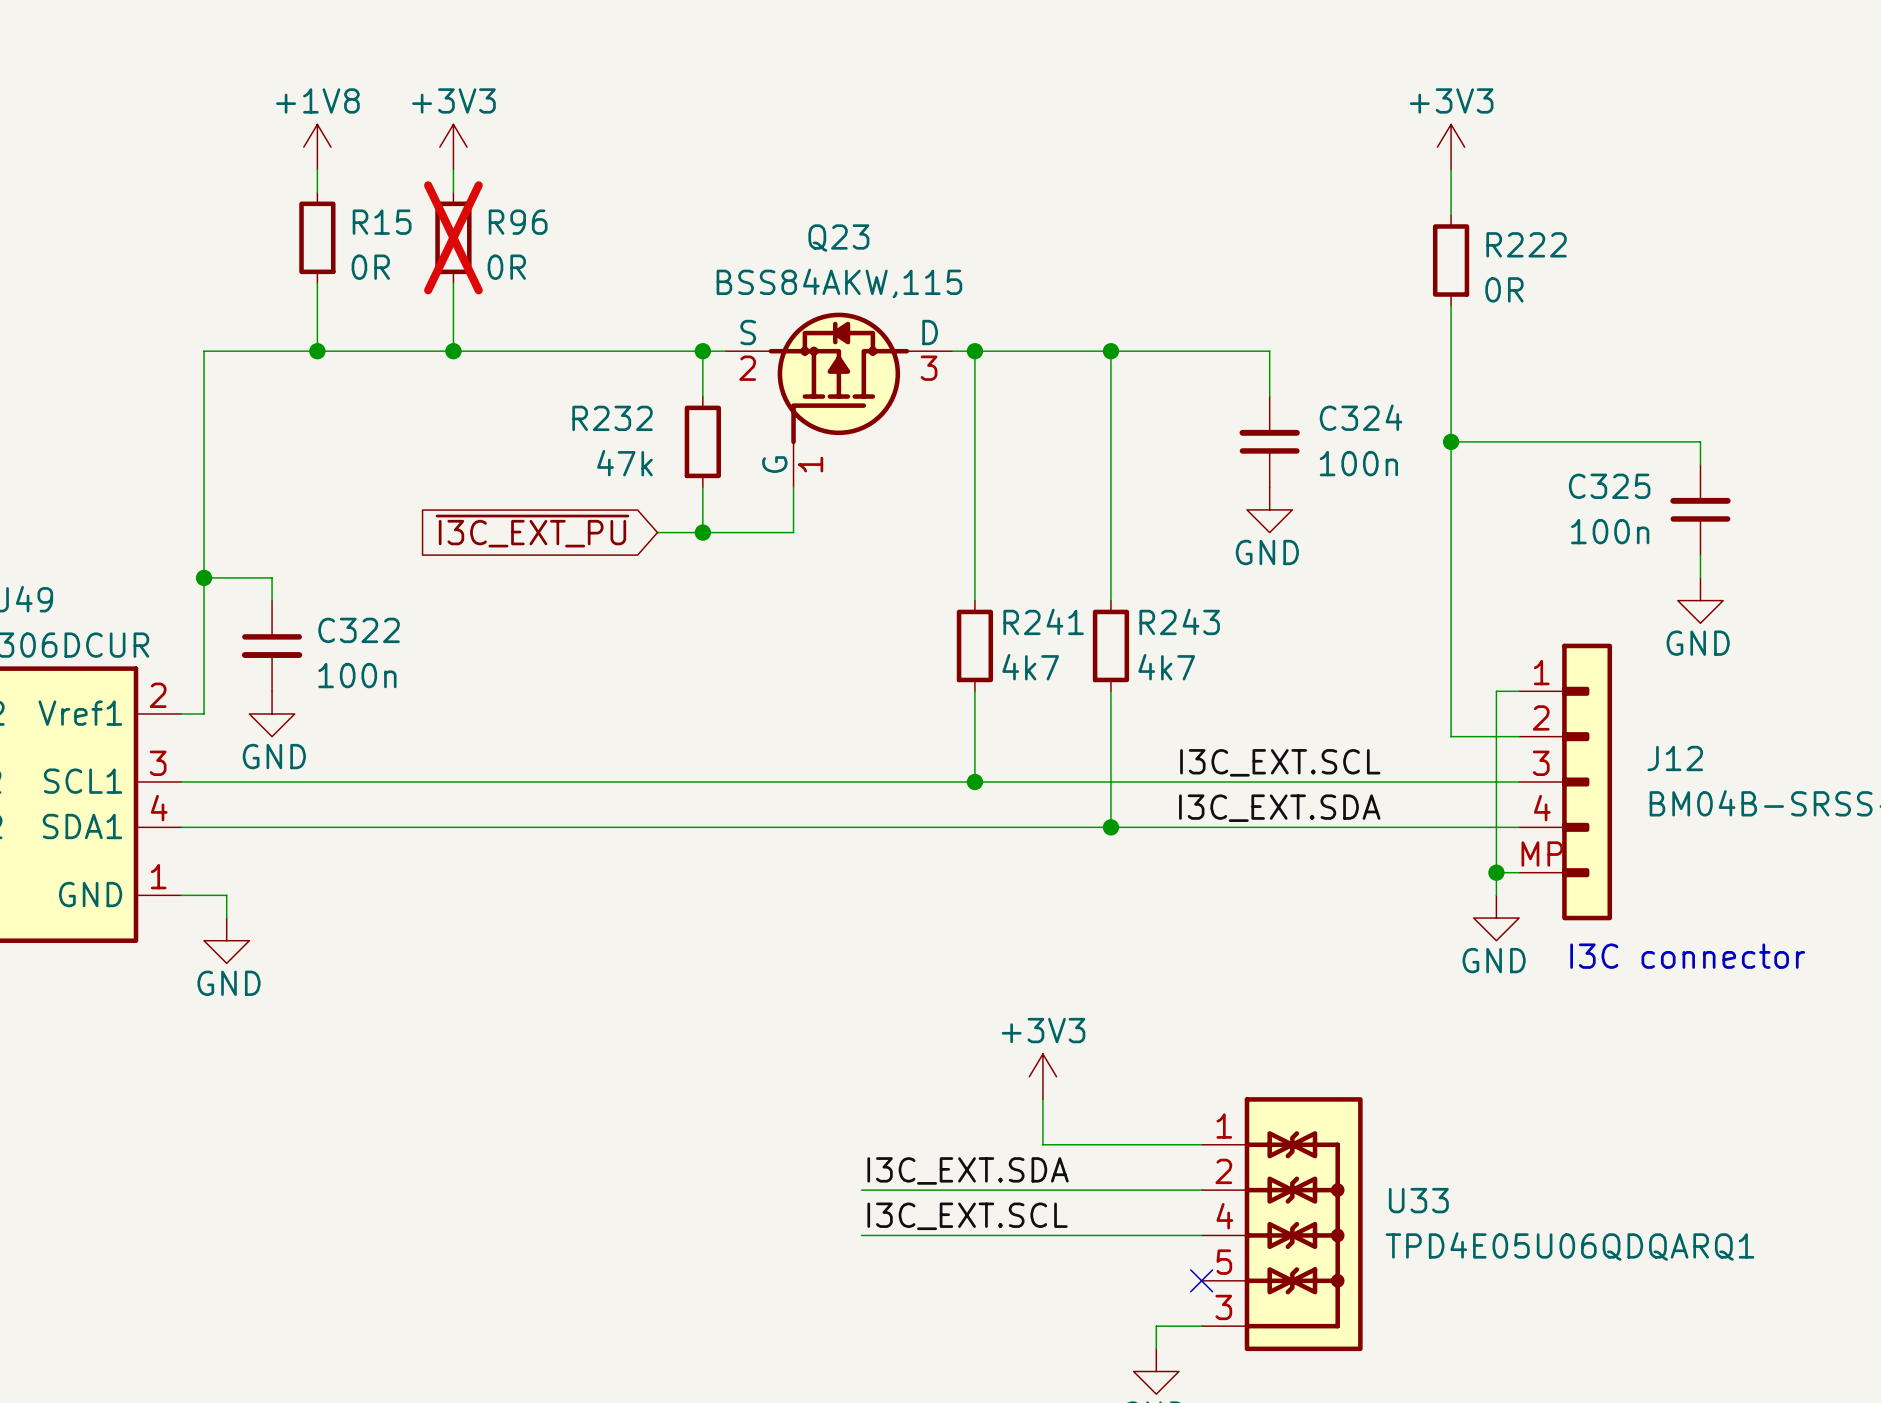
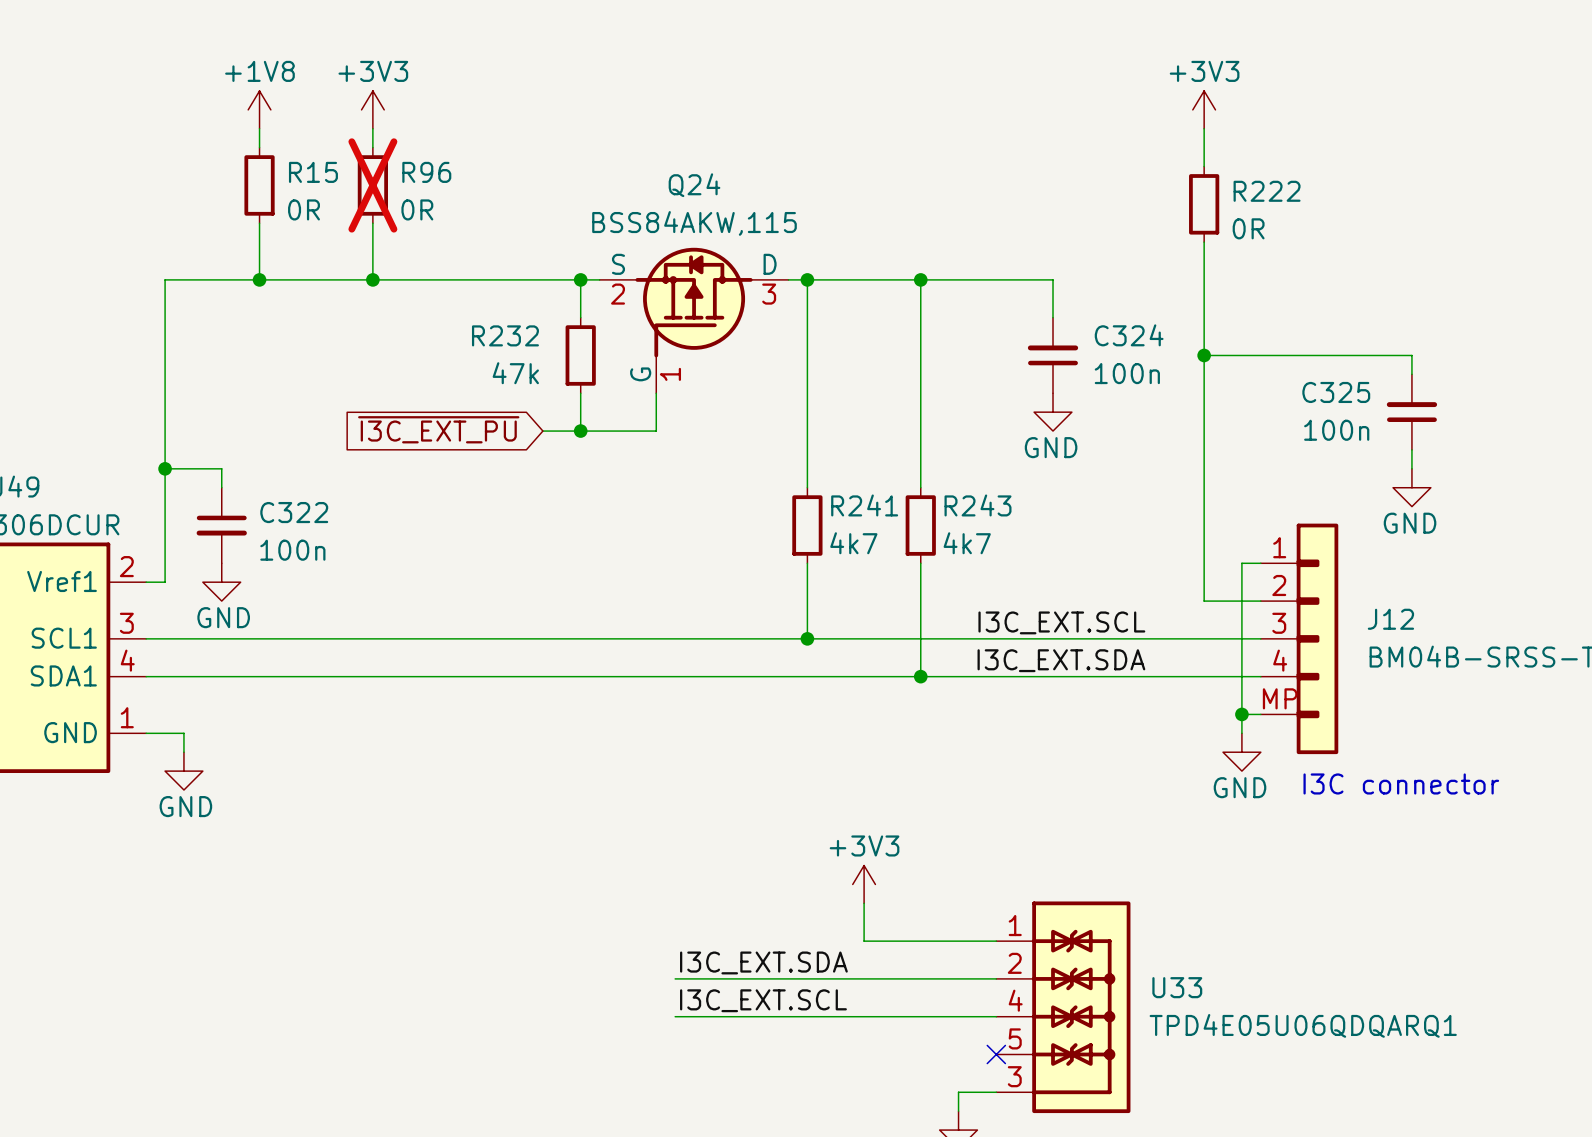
Q23 name: Q23 (838, 238) -> Q24 (694, 185)
label position: I3C_EXT.SDA (968, 1170) -> I3C_EXT.SDA (763, 962)
wire: none -> (675, 978) (712, 978)
label position: I3C_EXT.SCL (967, 1216) -> I3C_EXT.SCL (763, 1000)
wire: none -> (675, 1016) (712, 1016)

